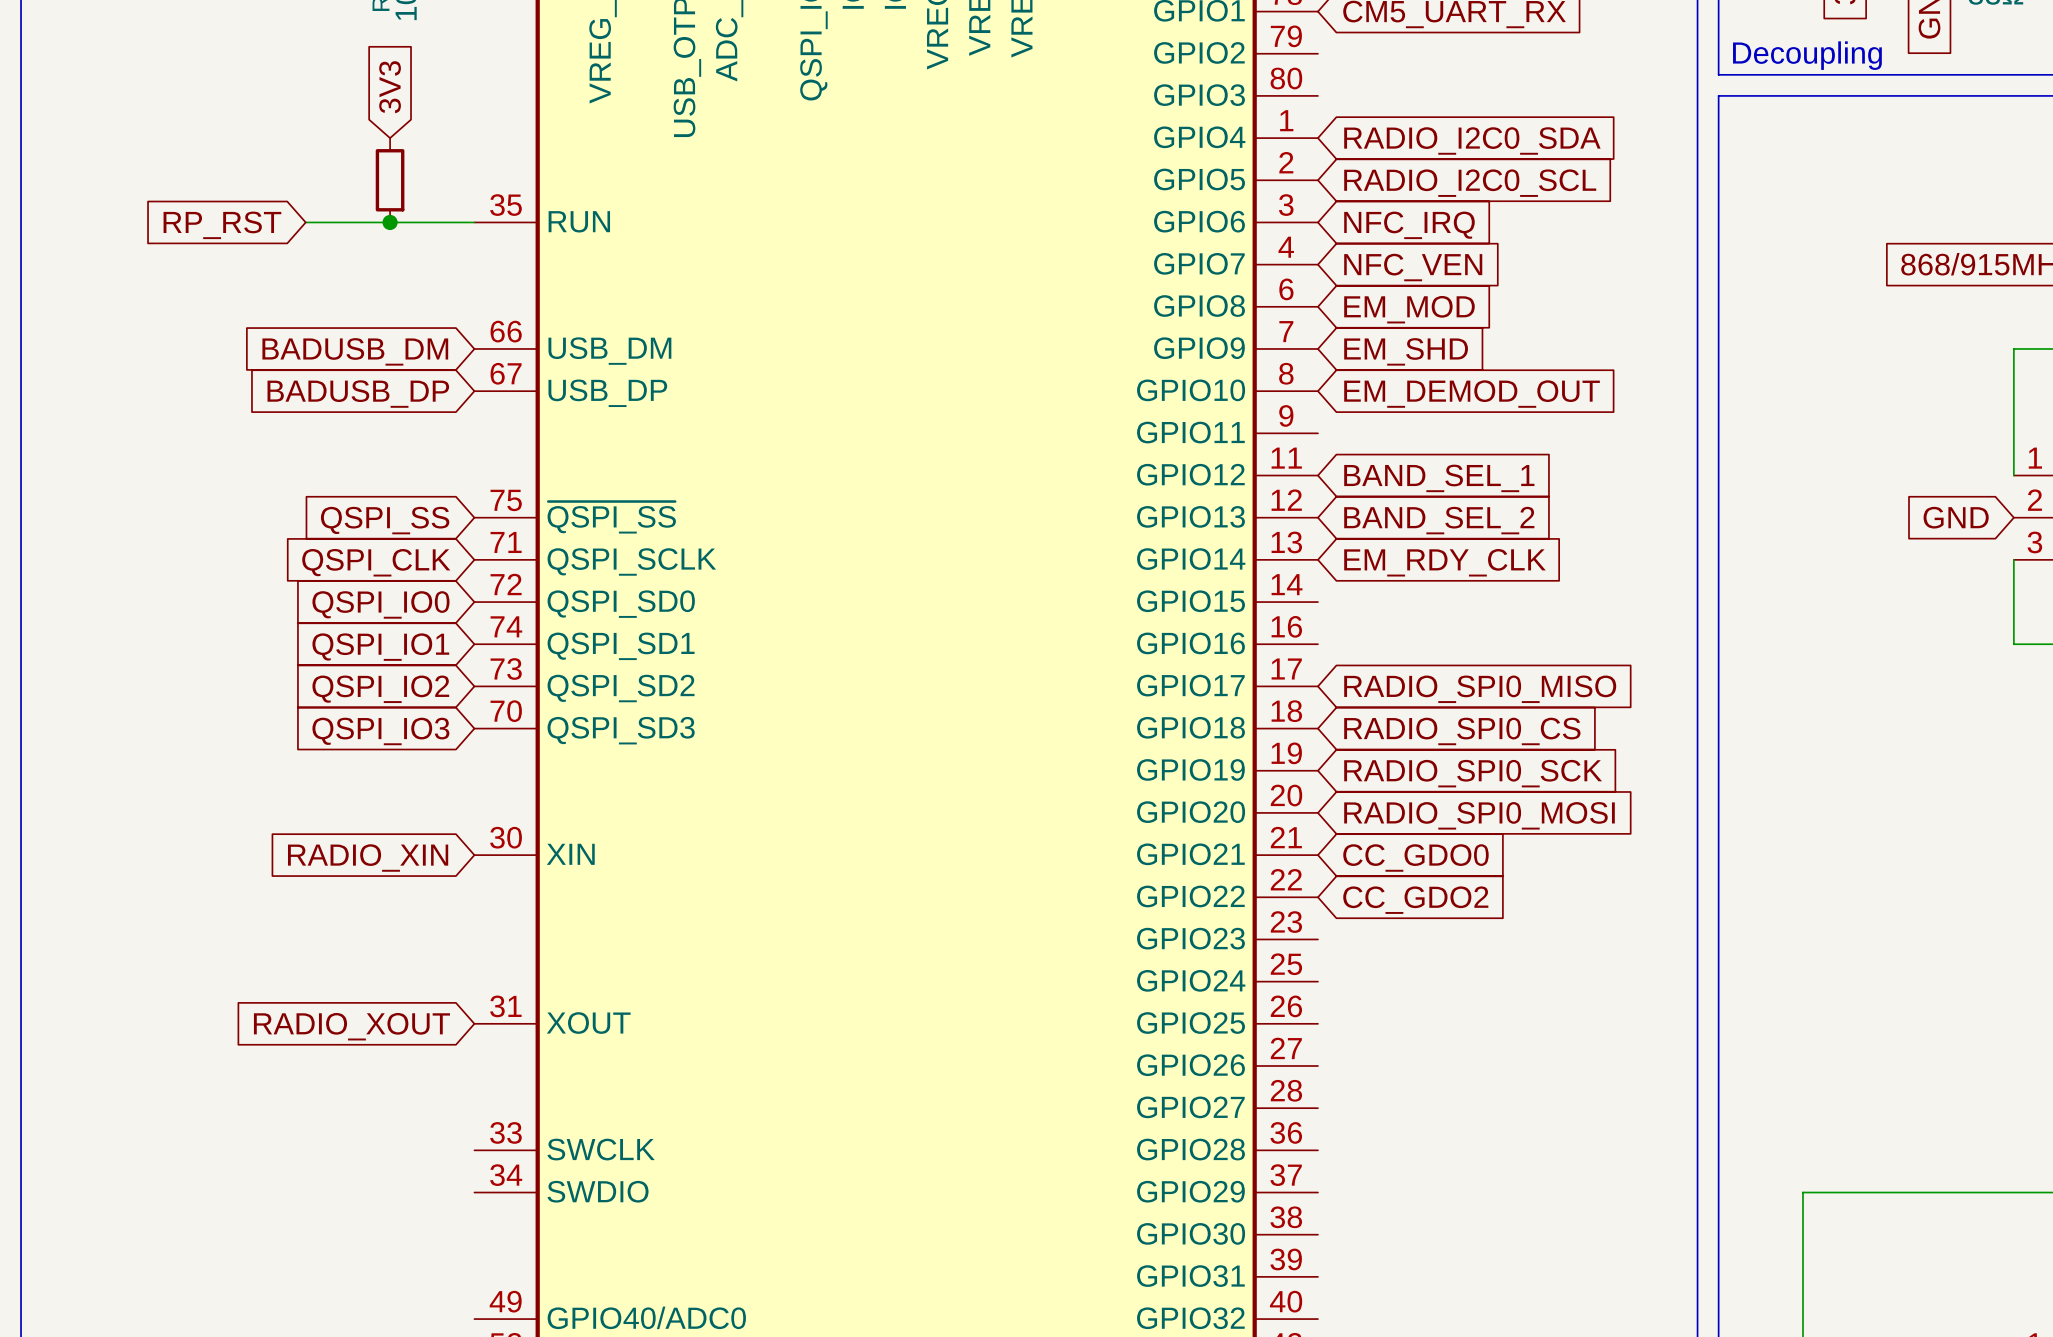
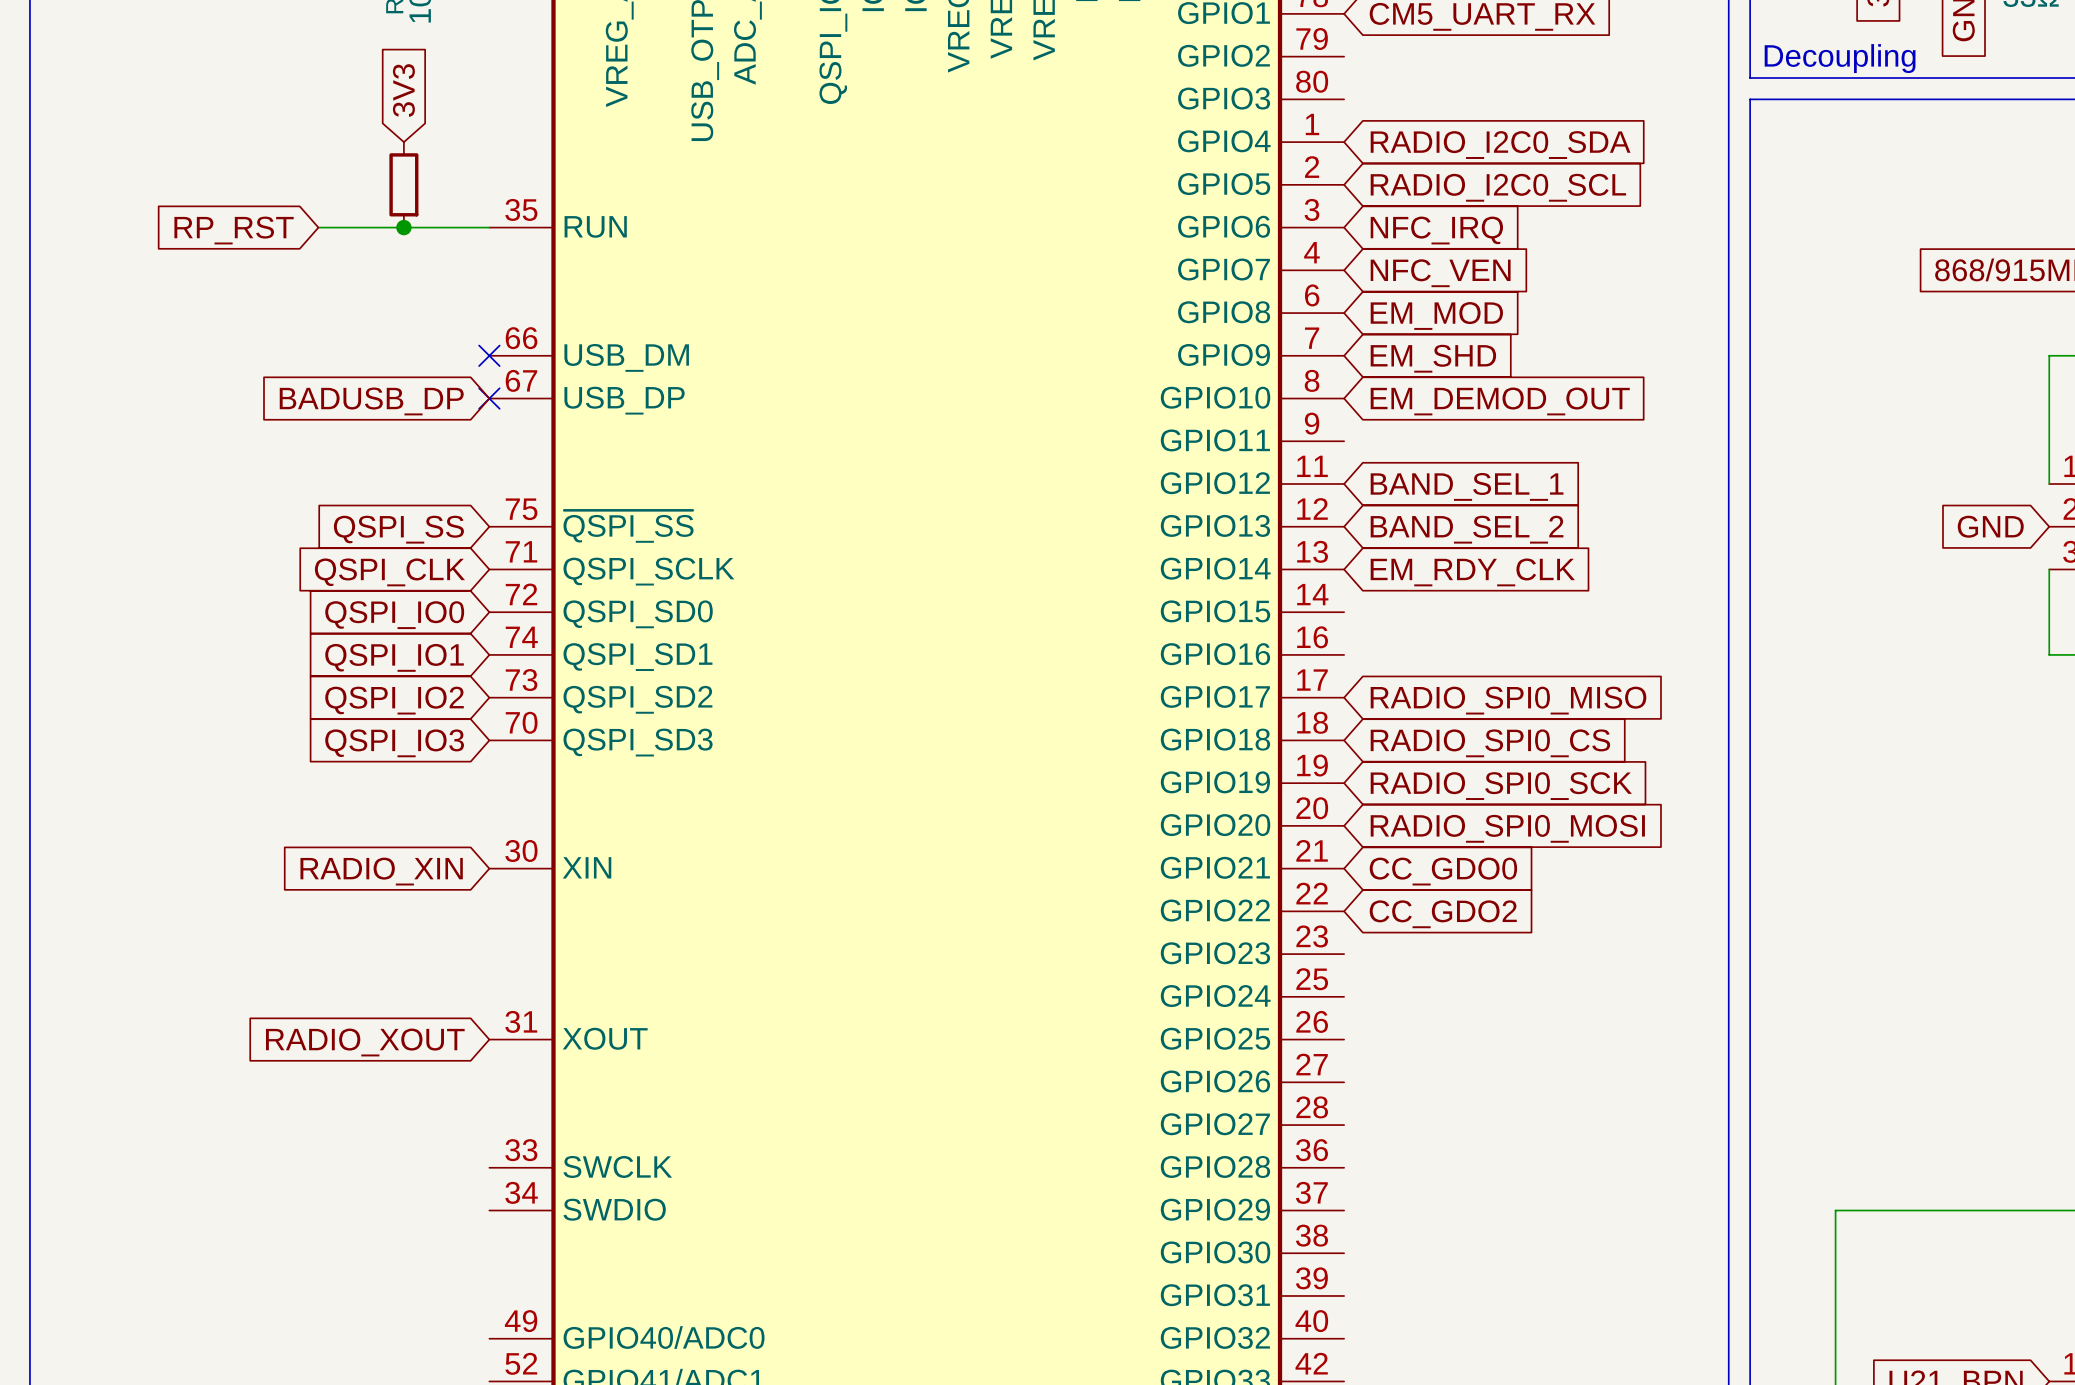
no-connect mark: none -> (489, 355)
global label: BADUSB_DM (355, 351) -> none
no-connect mark: none -> (489, 398)

